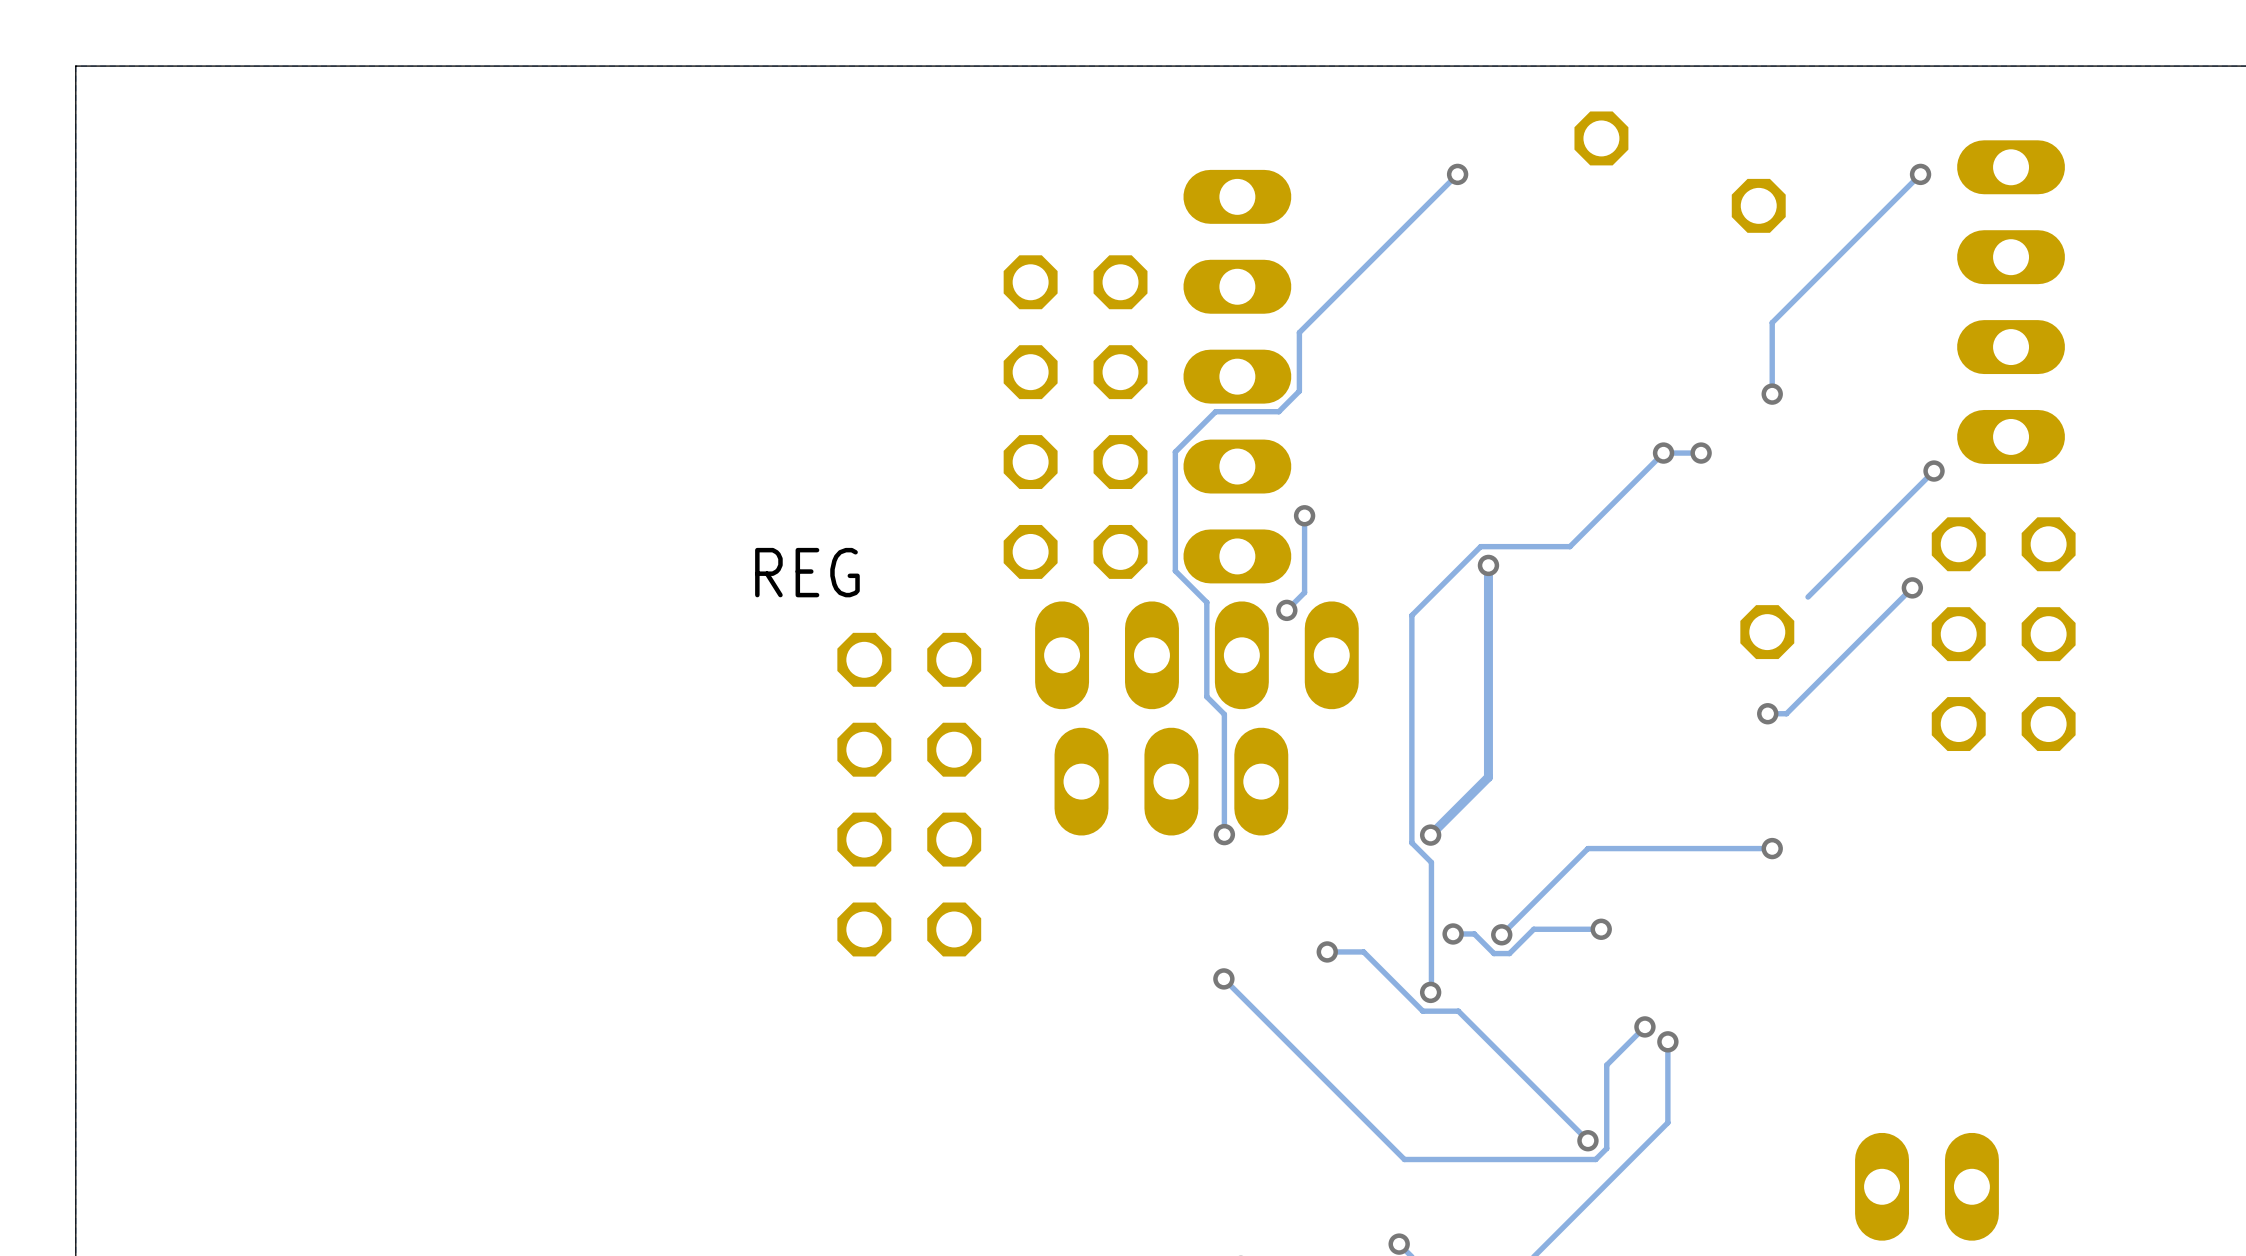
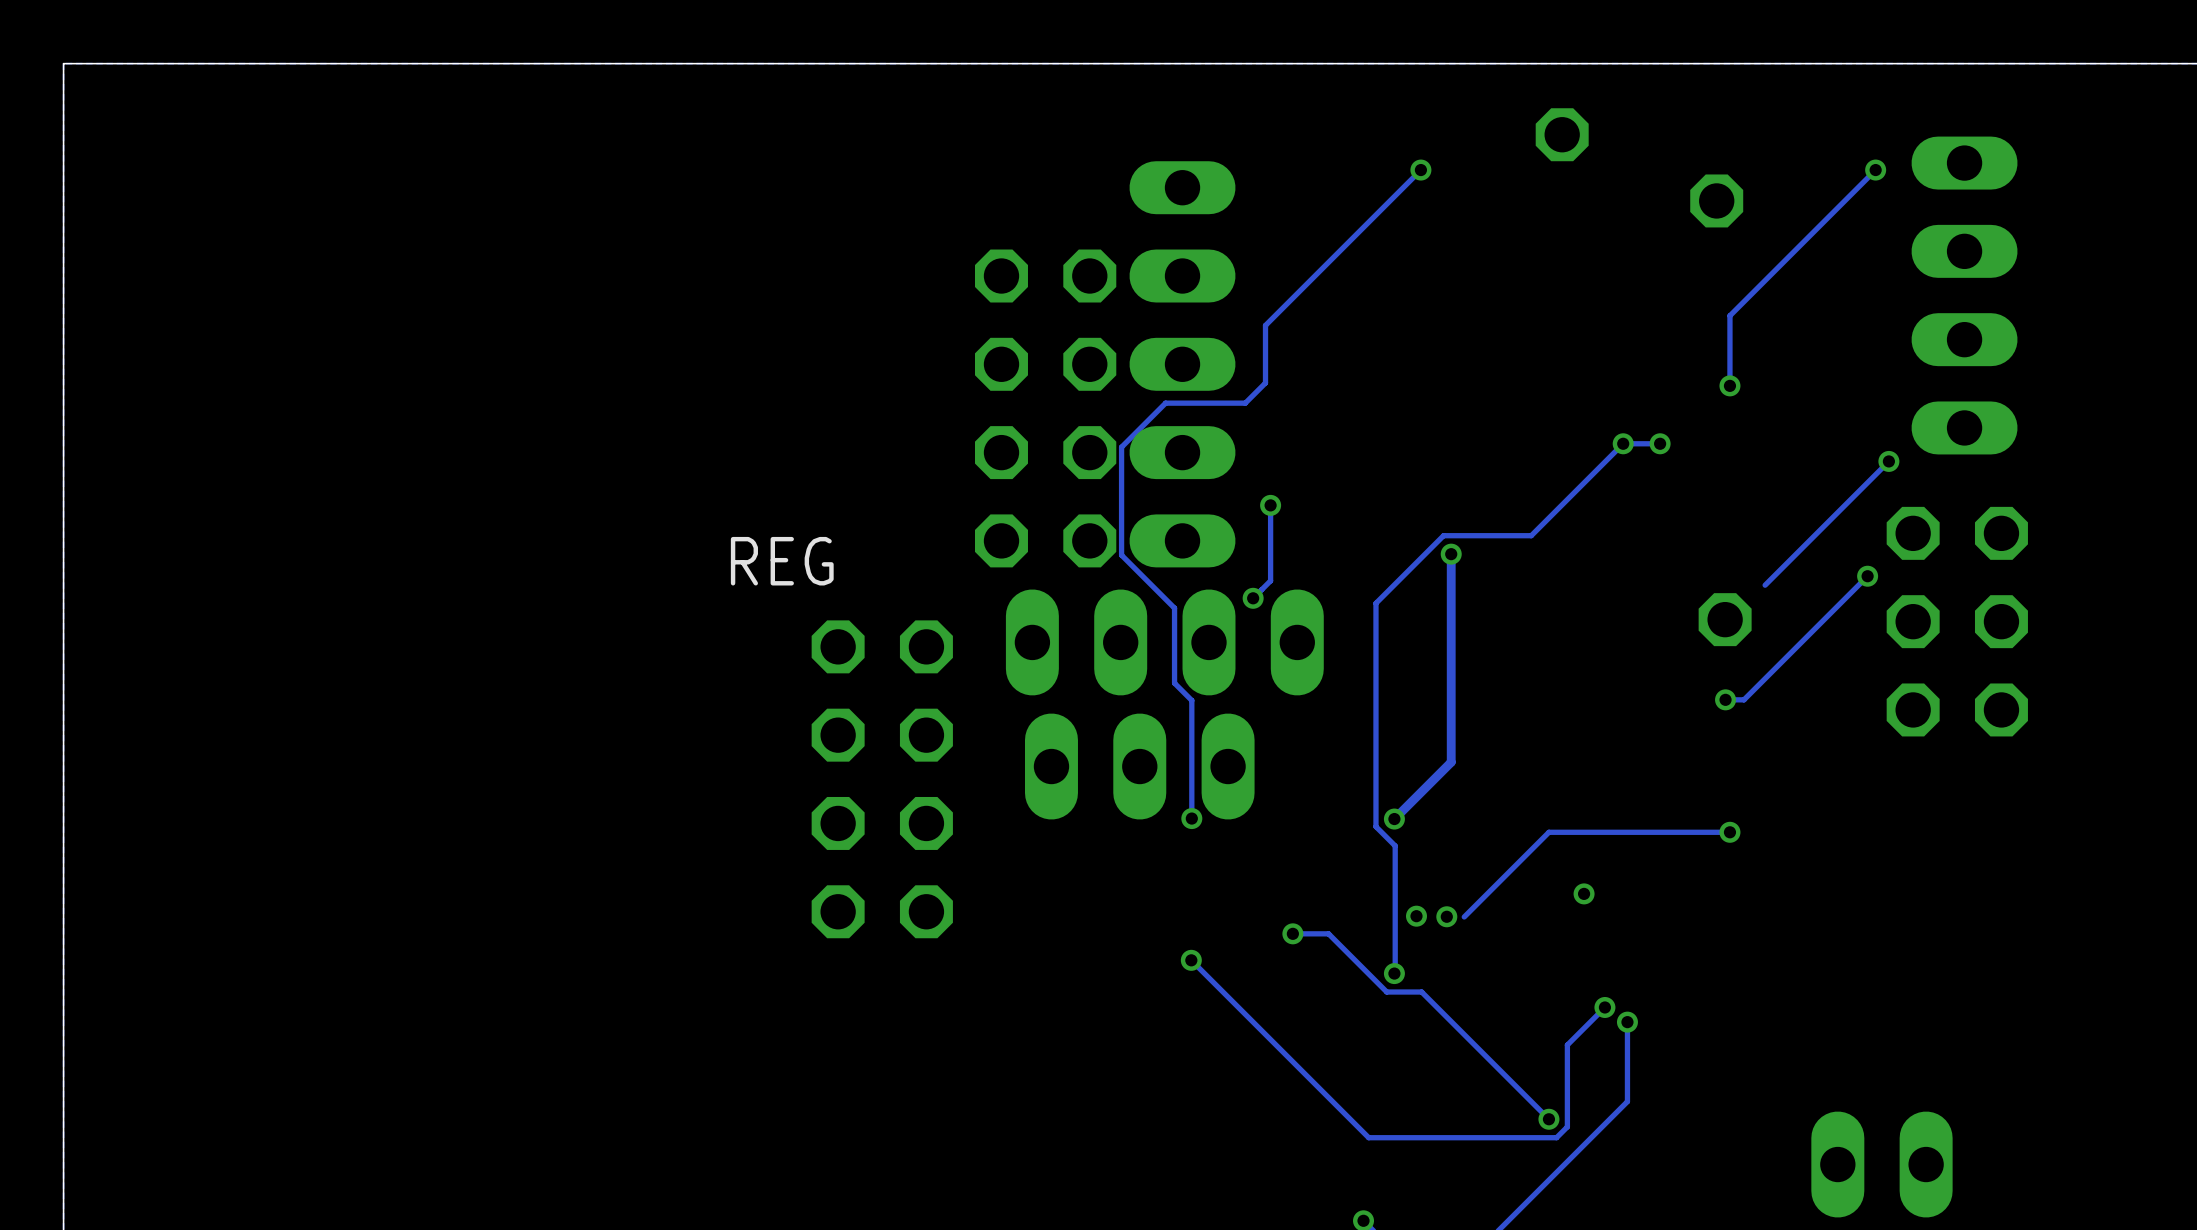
part position: (1237, 376) -> (1182, 364)
track: (1215, 411) (1175, 452) (1175, 570) (1206, 602) (1206, 620) -> (1183, 403) (1165, 403) (1121, 447) (1121, 555) (1174, 608)
track: (1601, 929) (1533, 929) (1509, 953) (1493, 953) (1474, 933) (1453, 933) -> none
via position: (1601, 929) -> (1584, 893)
via position: (1501, 934) -> (1446, 916)

